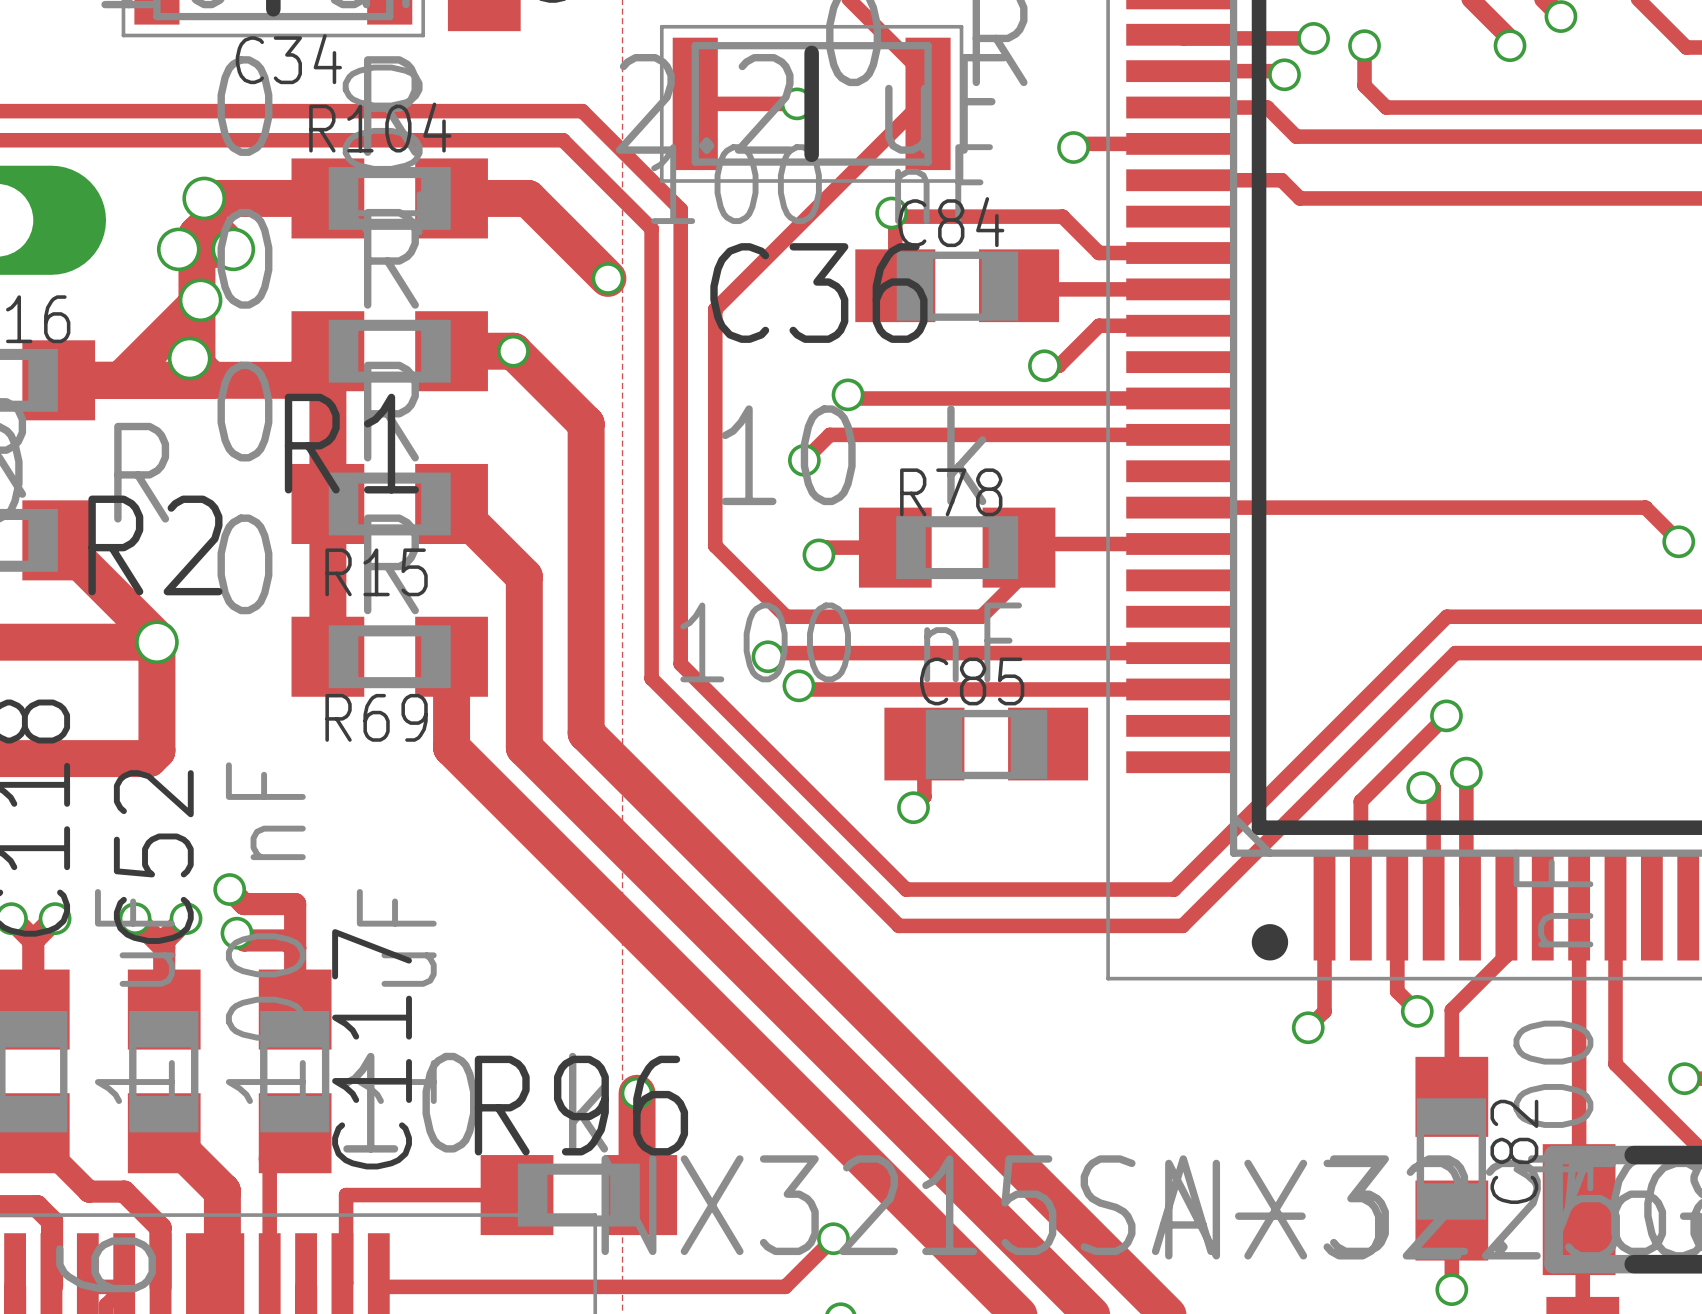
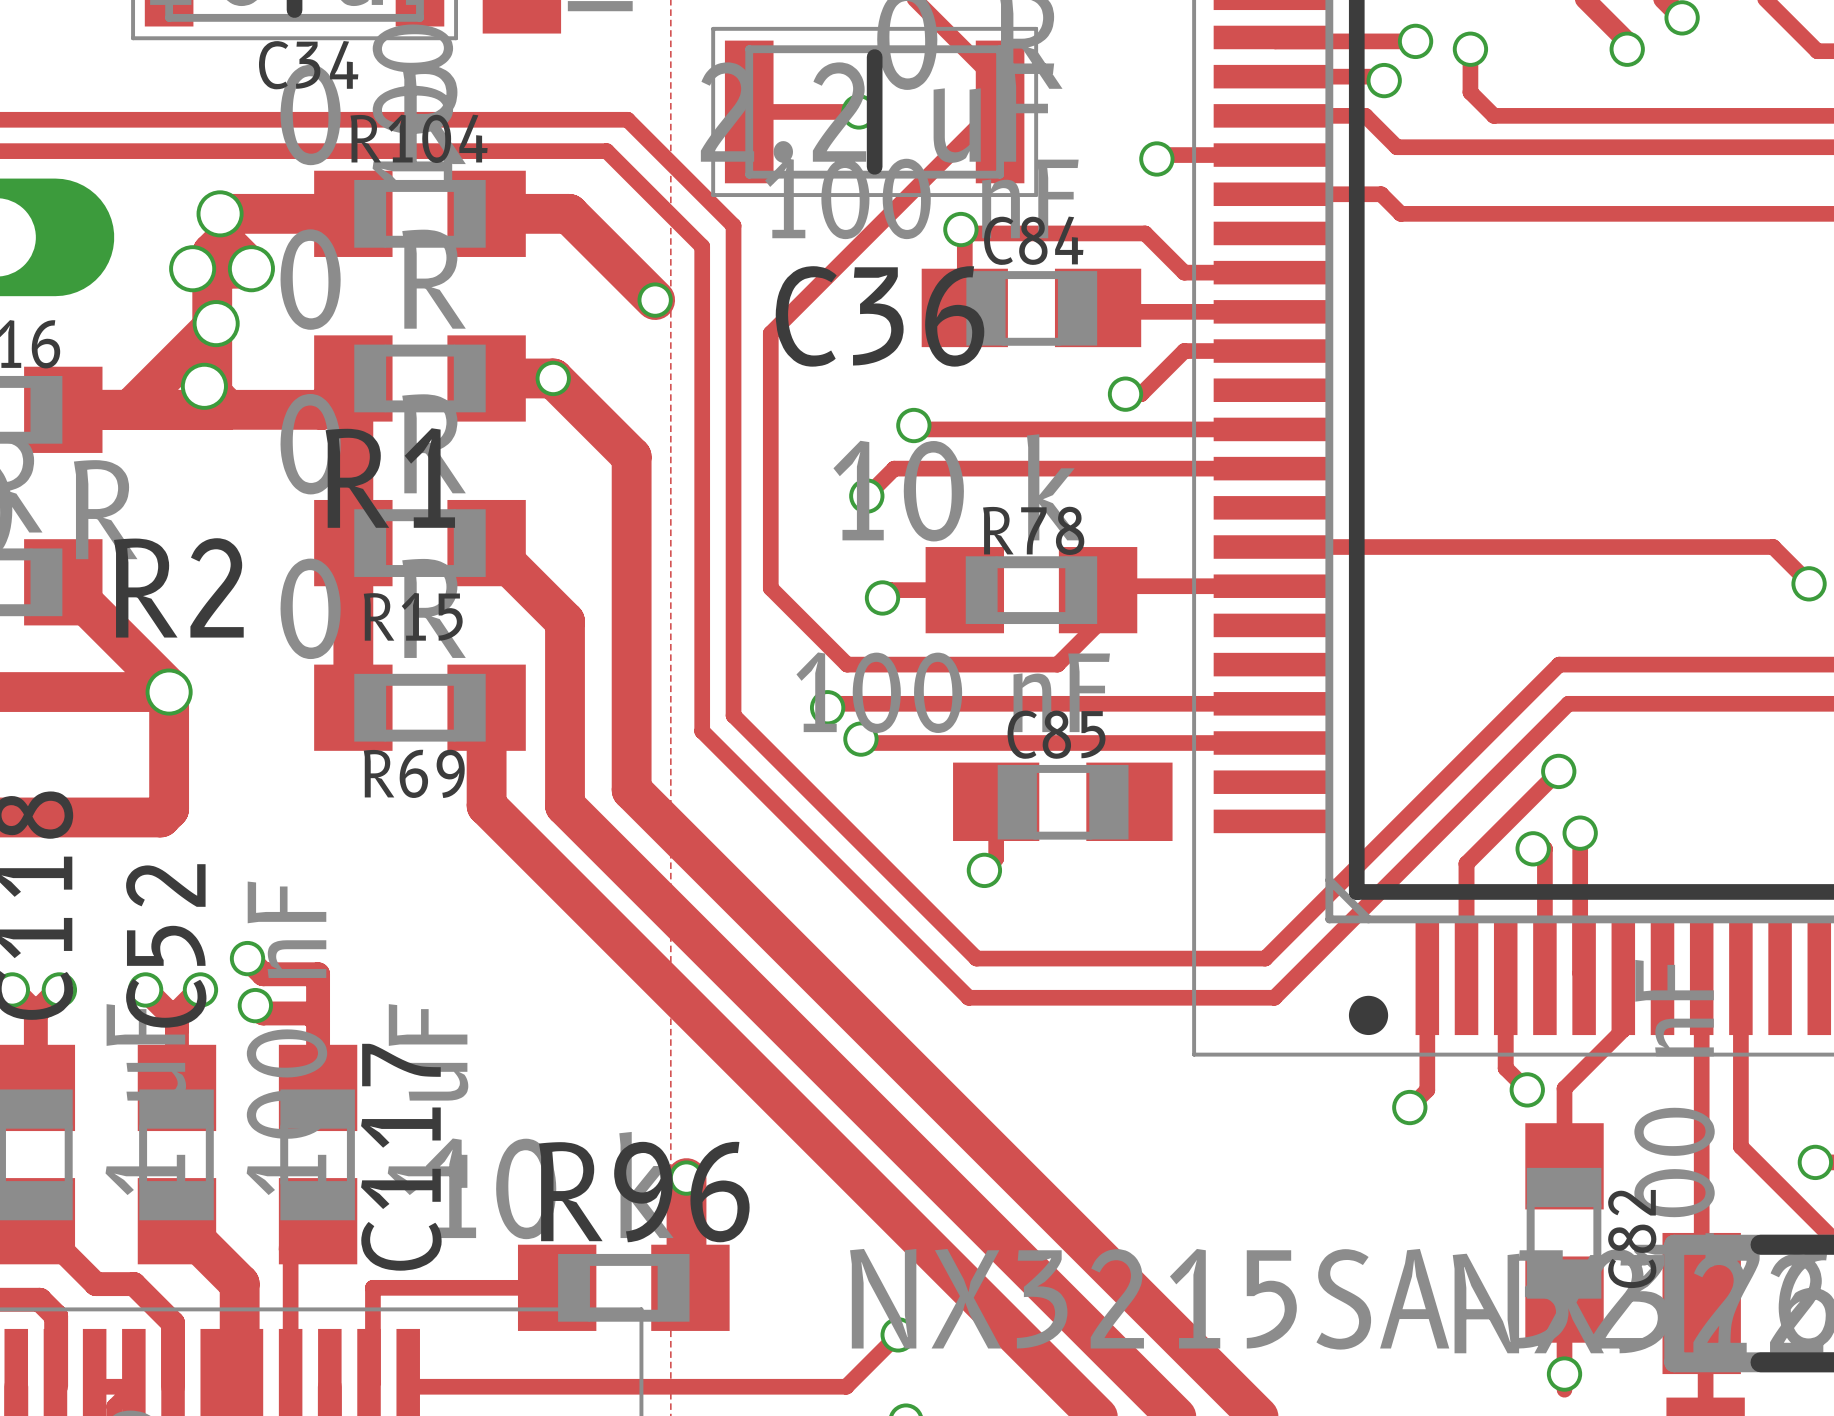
C82 position: (1451, 1158) -> (1564, 1232)
via position: (1451, 1289) -> (1564, 1374)

